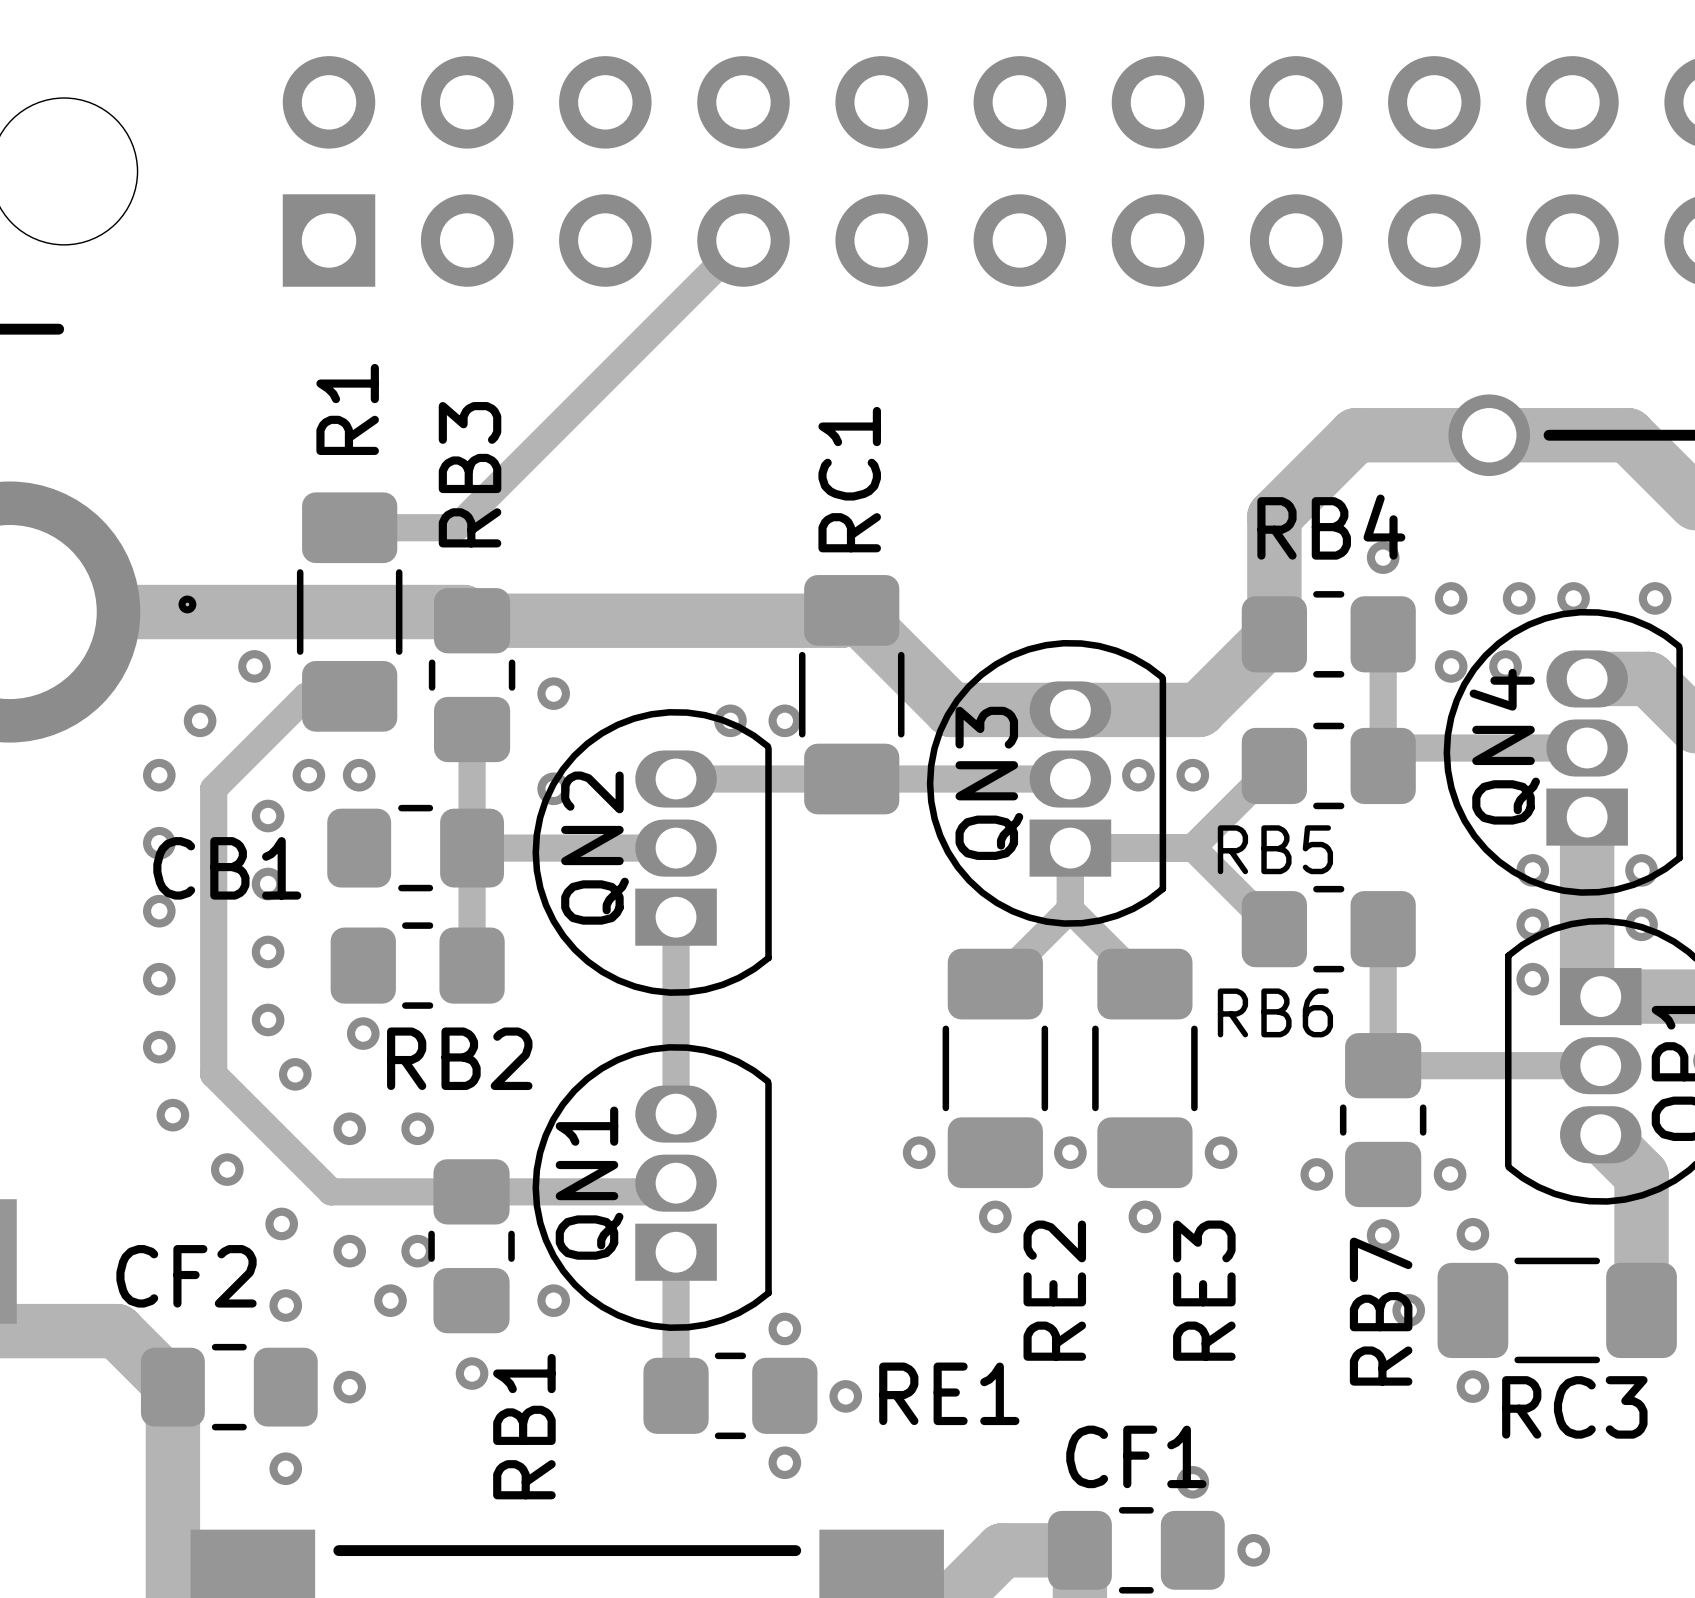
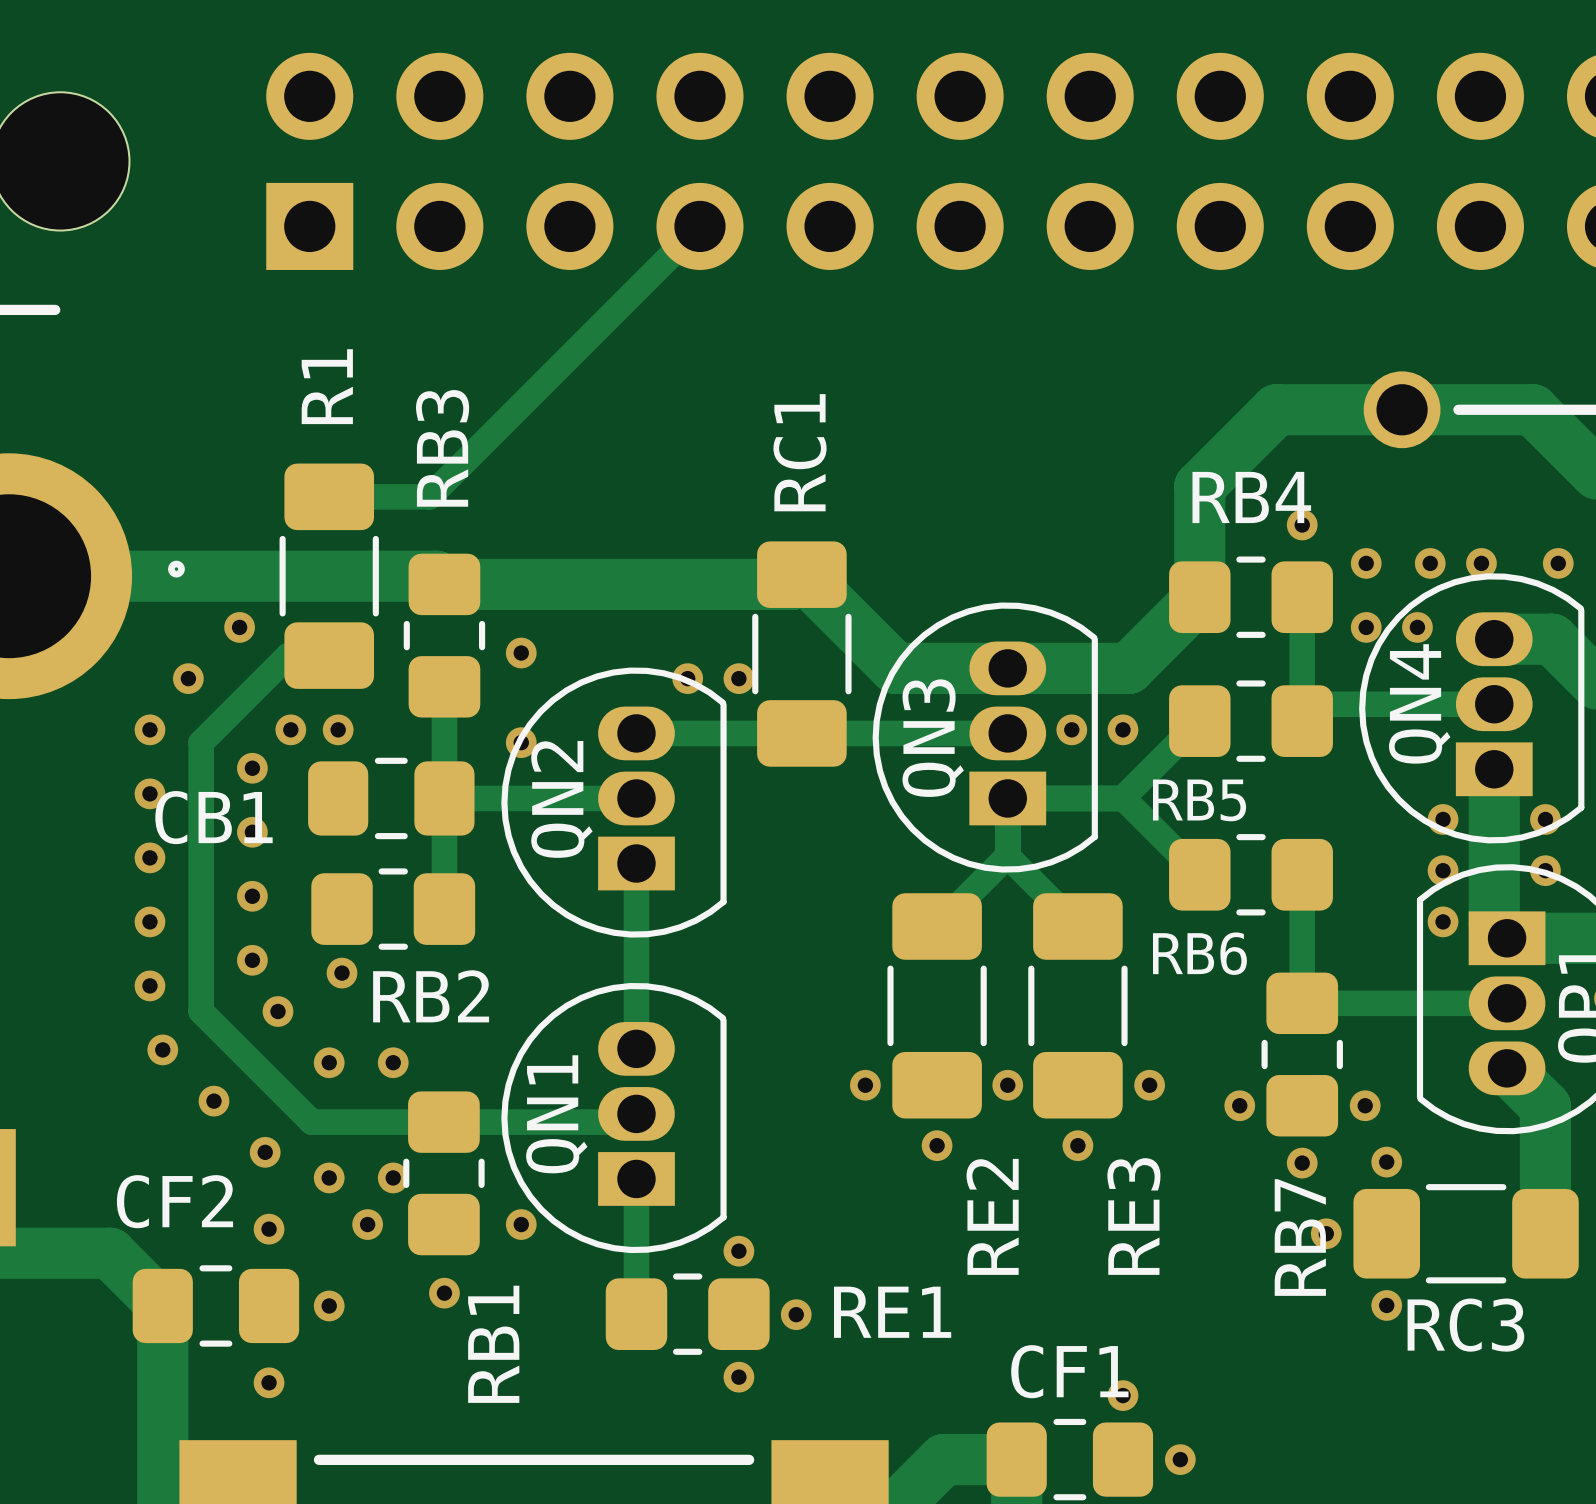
RC3 name position: RC3 (1574, 1407) -> RC3 (1465, 1325)

